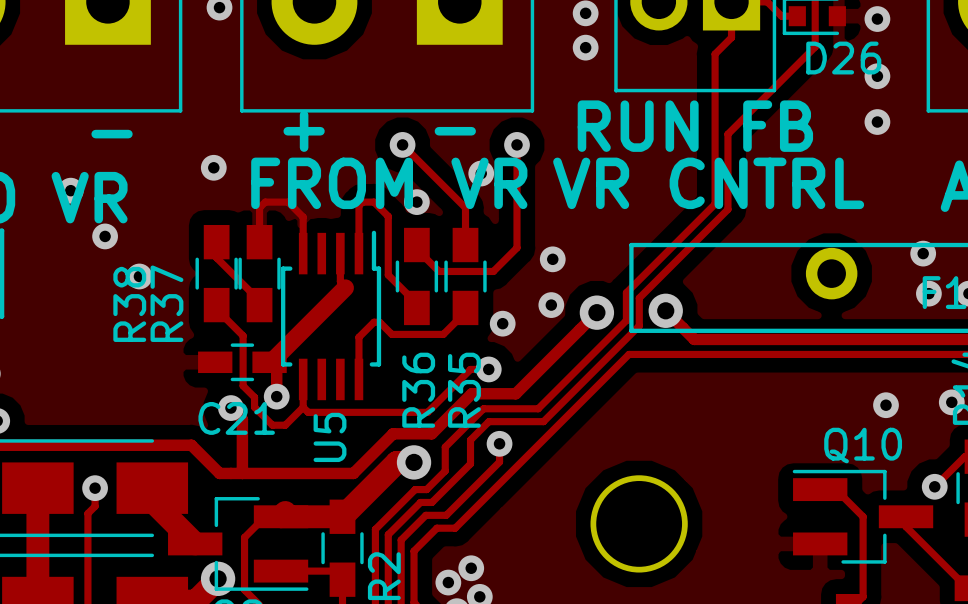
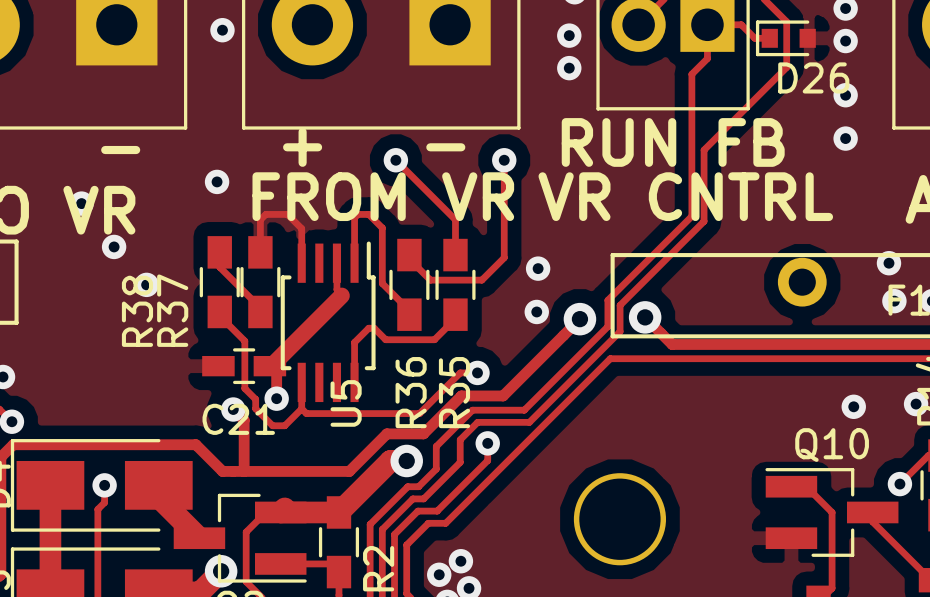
via: (481, 173) -> none
via: (416, 202) -> none
via: (502, 323) -> none
U5 name position: U5 (330, 437) -> U5 (346, 403)

